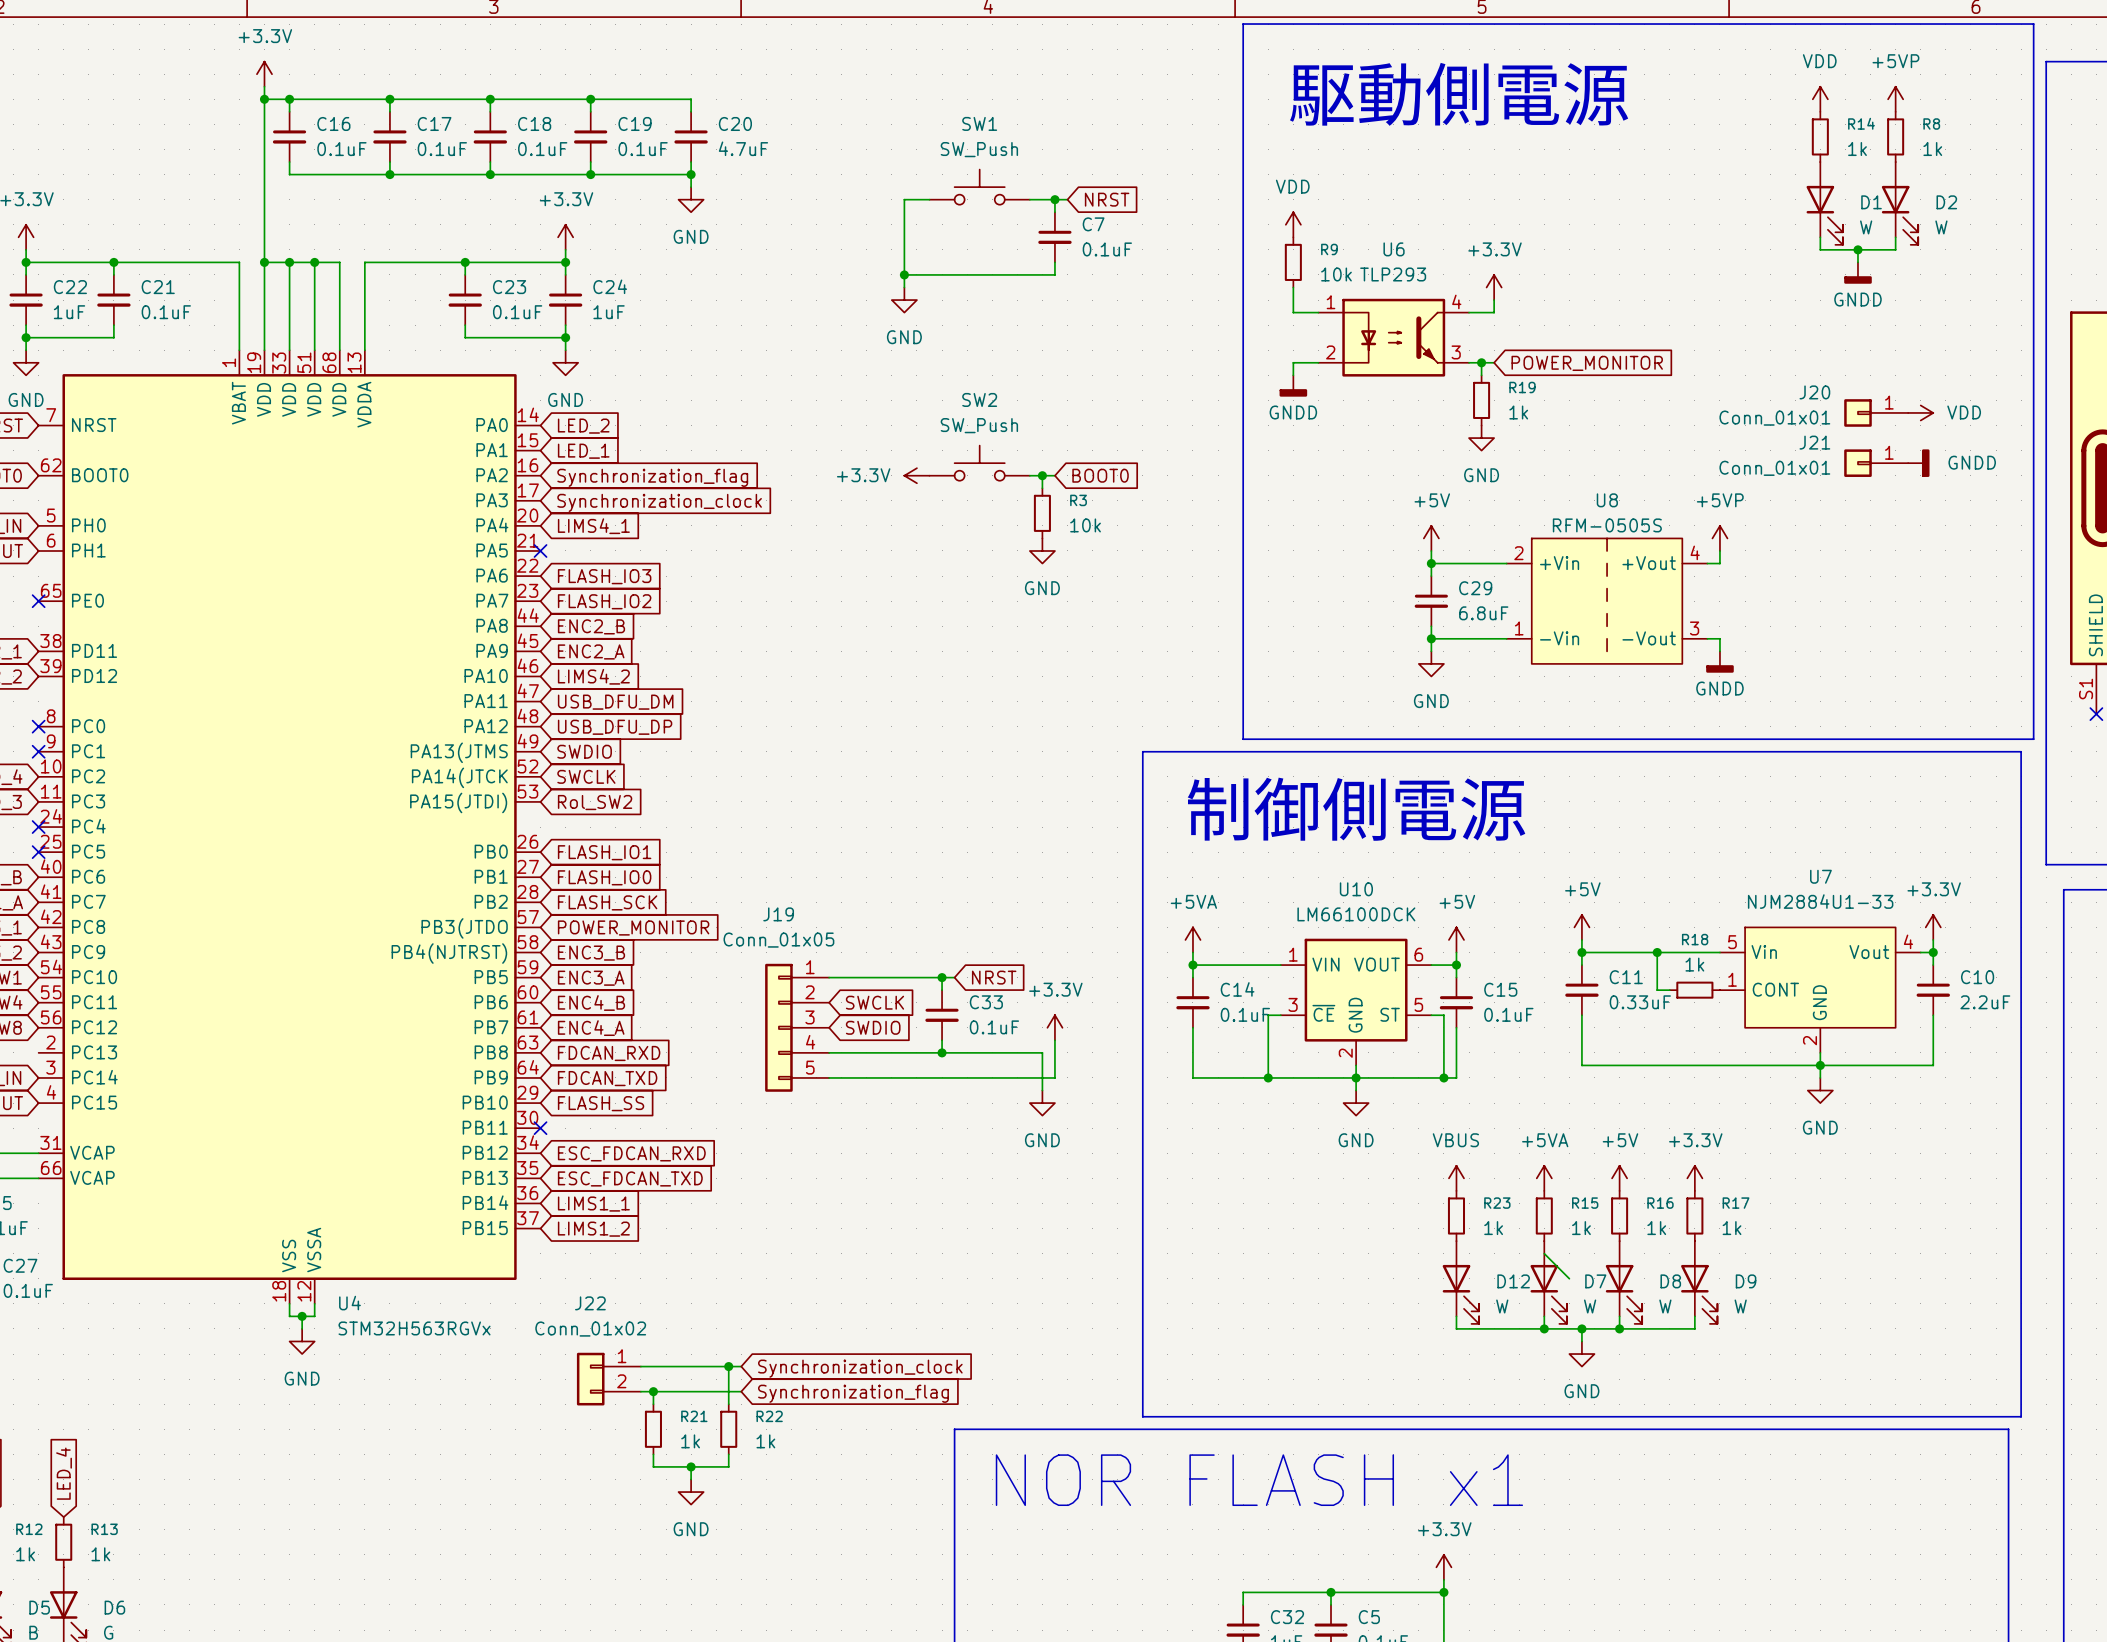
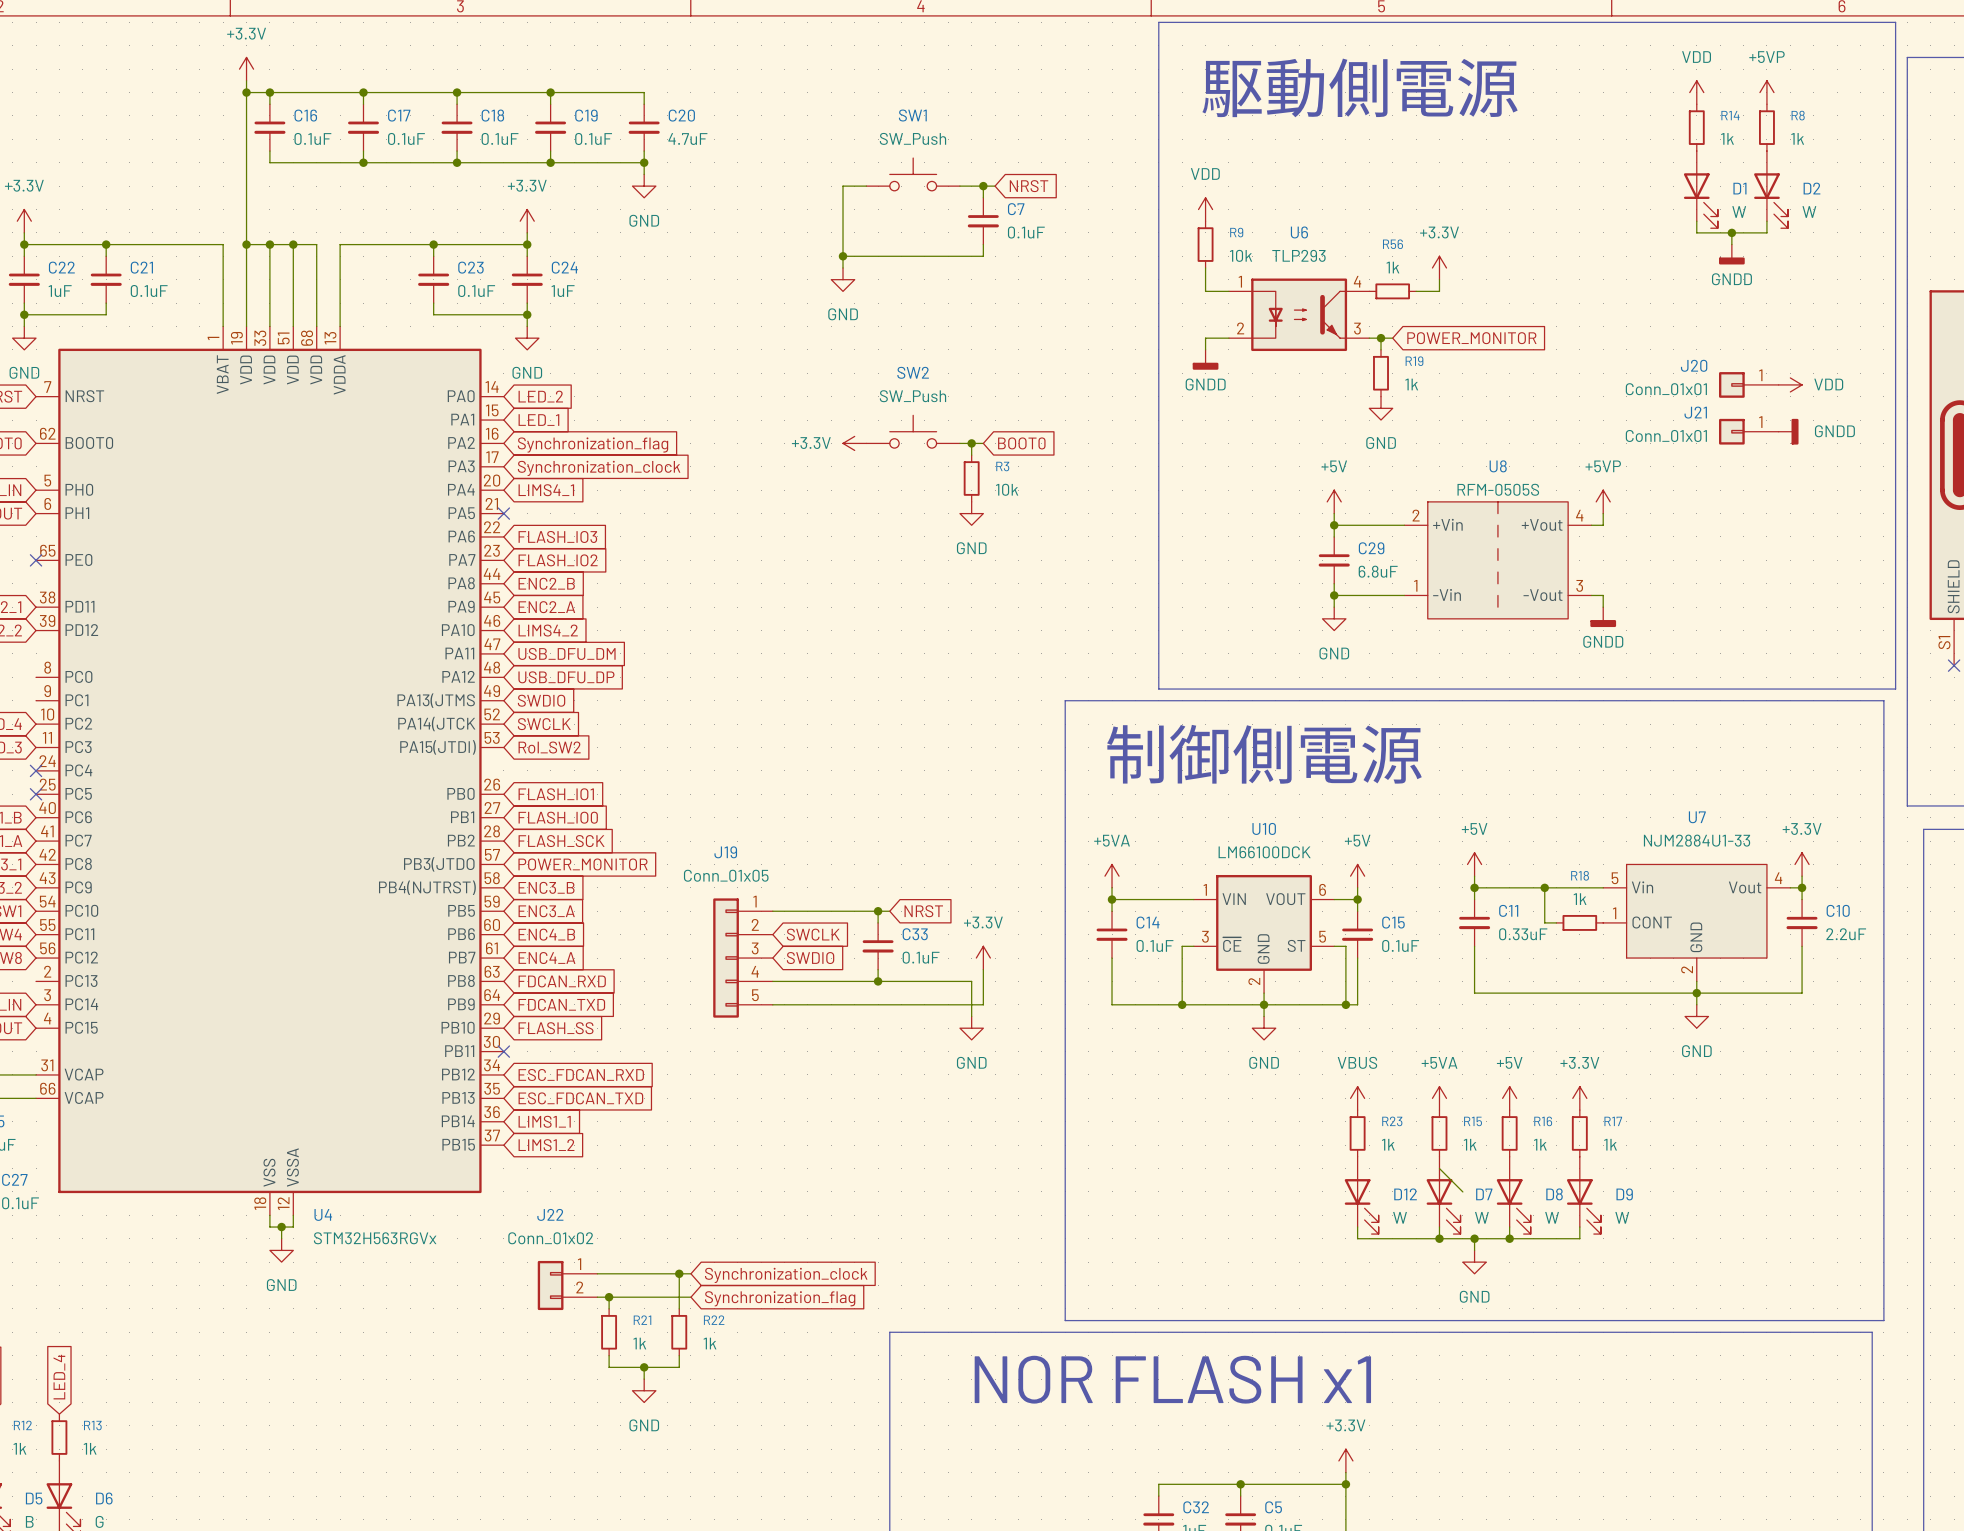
power symbol position: +3.3V (1494, 287) -> +3.3V (1439, 267)
wire: (1494, 300) (1494, 312) (1469, 312) -> (1439, 279) (1439, 291) (1416, 291)
R56: none -> 1k (1392, 291)
no-connect mark: (38, 726) -> none
no-connect mark: (38, 751) -> none

